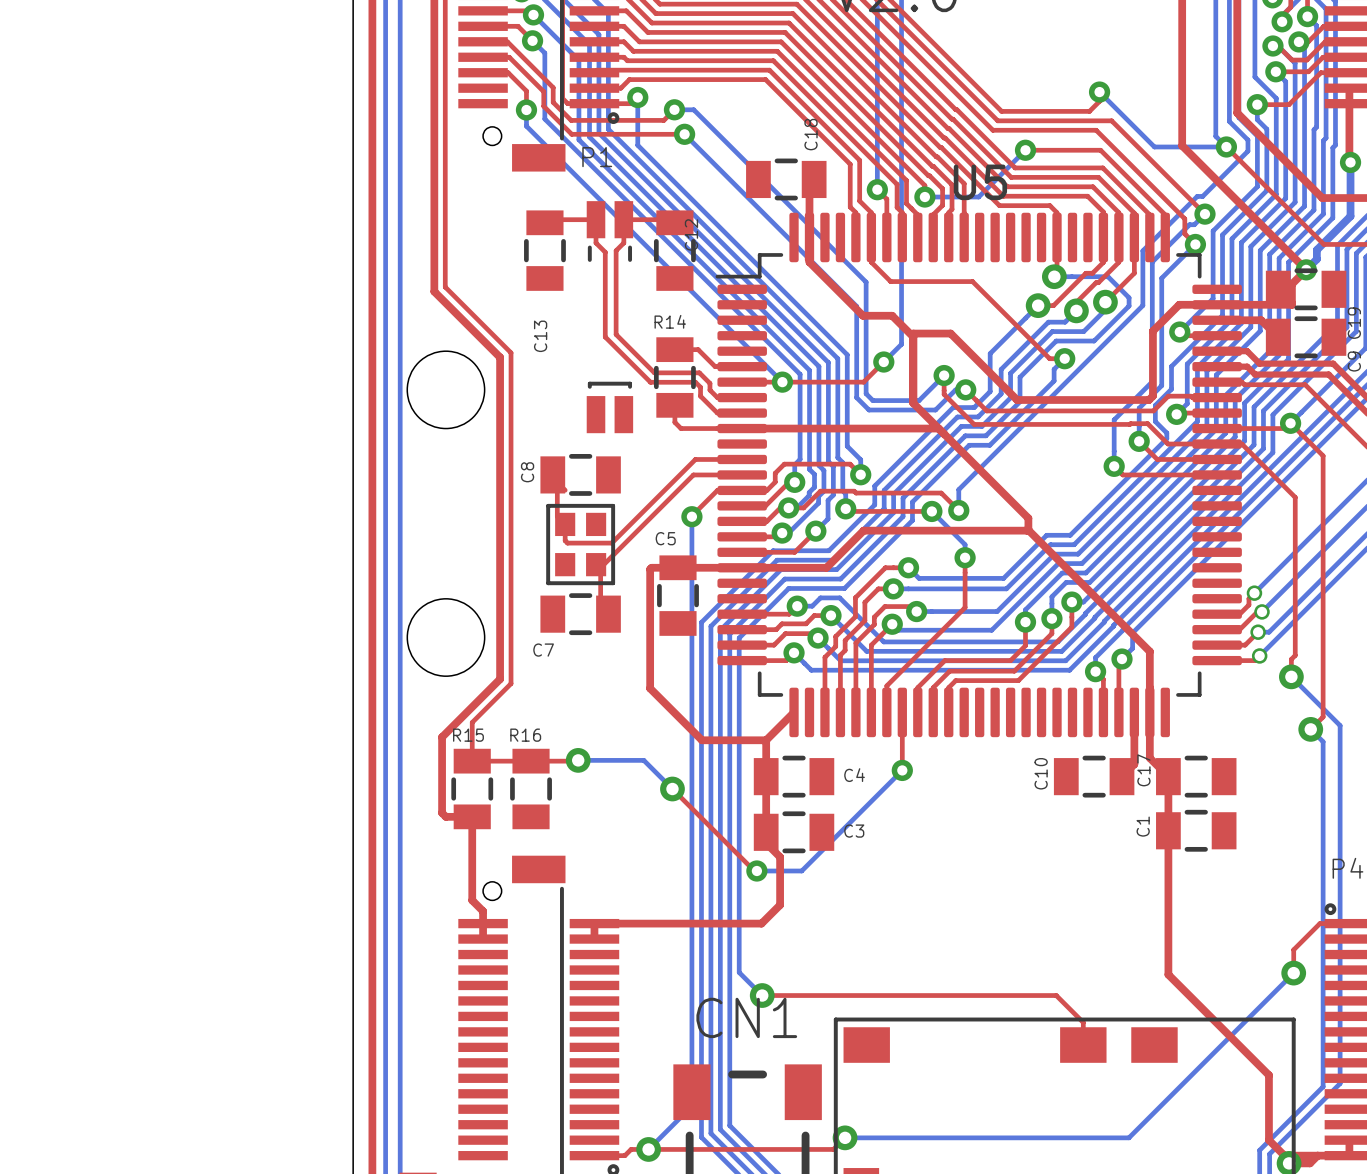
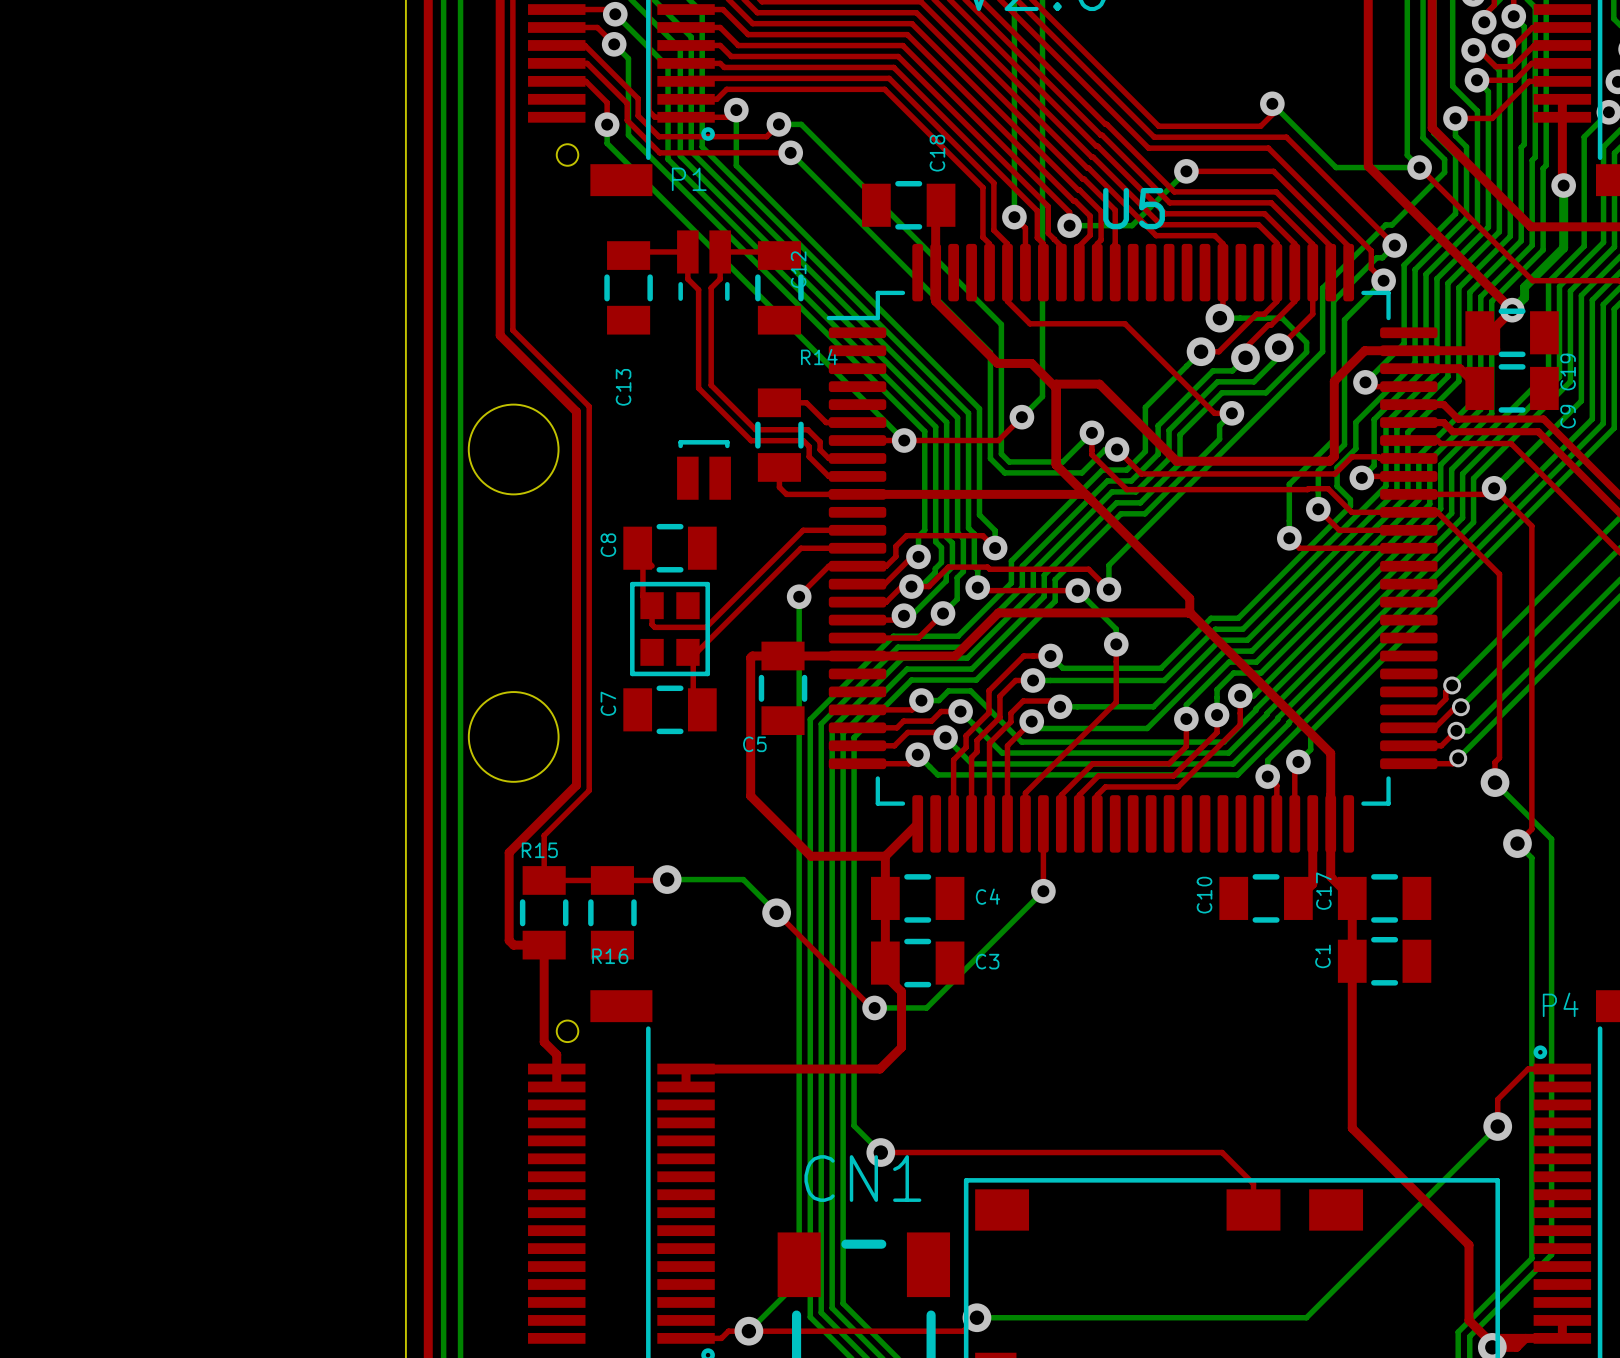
R14 name position: R14 (670, 321) -> R14 (819, 357)
C5 name position: C5 (665, 538) -> C5 (754, 744)
C7 name rotation: 0° (543, 650) -> 90° counterclockwise (608, 703)
C7 name position: C7 (543, 650) -> C7 (608, 703)
R16 name position: R16 (525, 735) -> R16 (610, 956)

